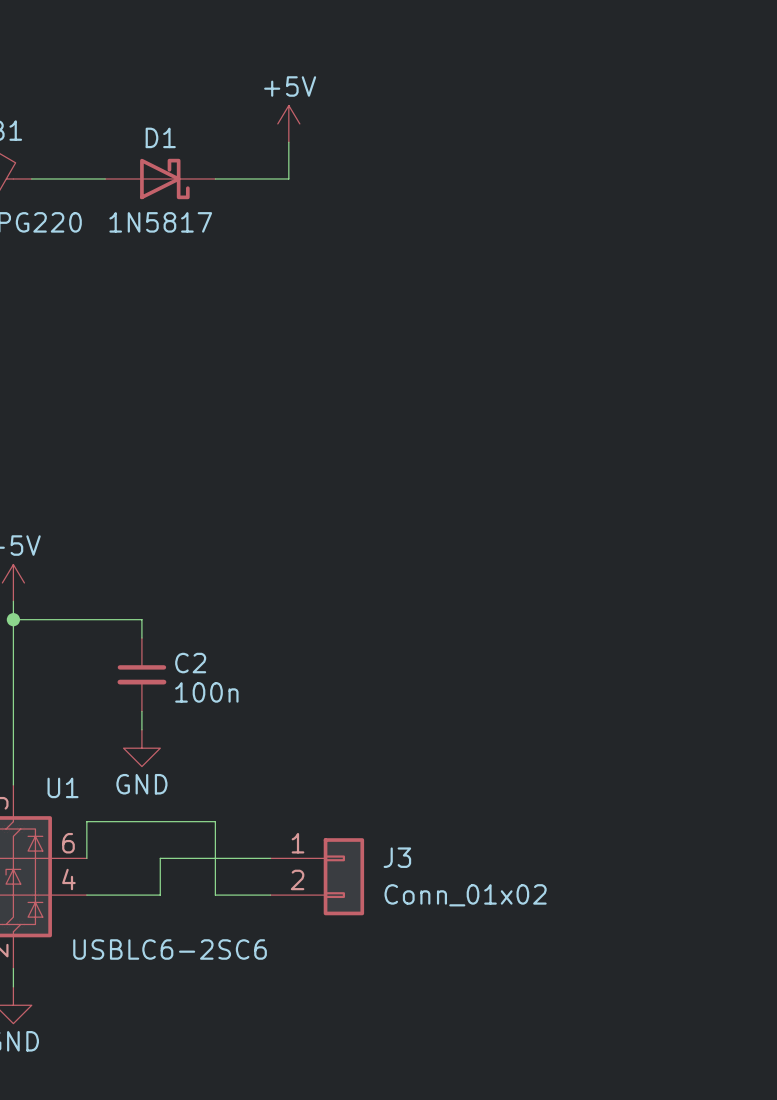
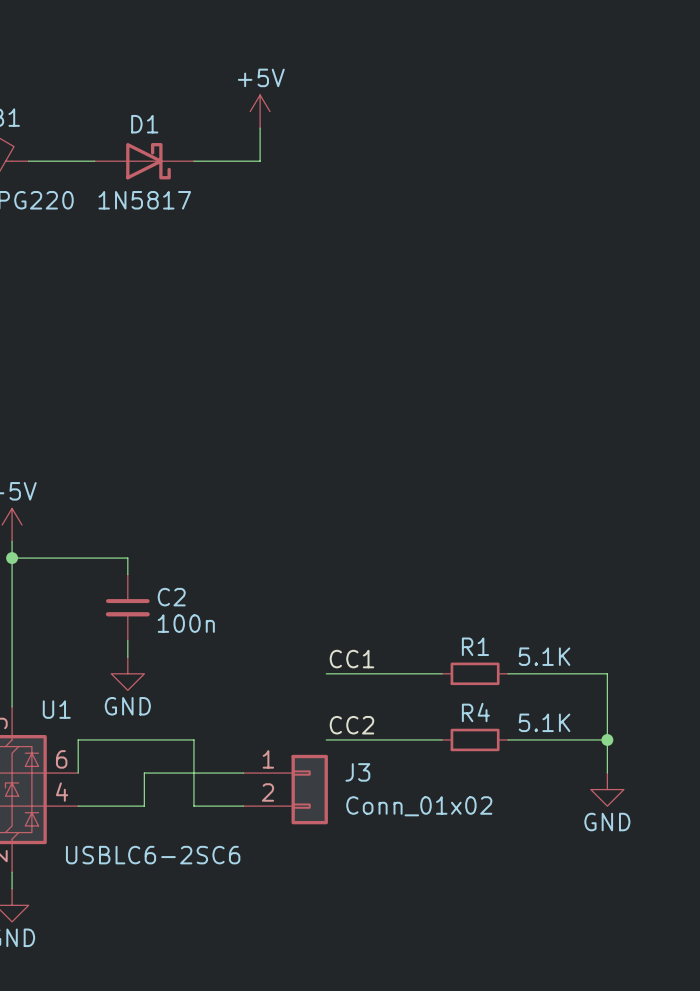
label: none -> CC1 (351, 659)
wire: none -> (326, 673) (442, 673)
R1: none -> 5.1K (475, 673)
wire: none -> (508, 673) (607, 673) (607, 773)
label: none -> CC2 (351, 725)
wire: none -> (326, 739) (442, 739)
R4: none -> 5.1K (475, 739)
wire: none -> (508, 739) (607, 739)
junction: none -> (607, 739)
power symbol: none -> GND (607, 789)

